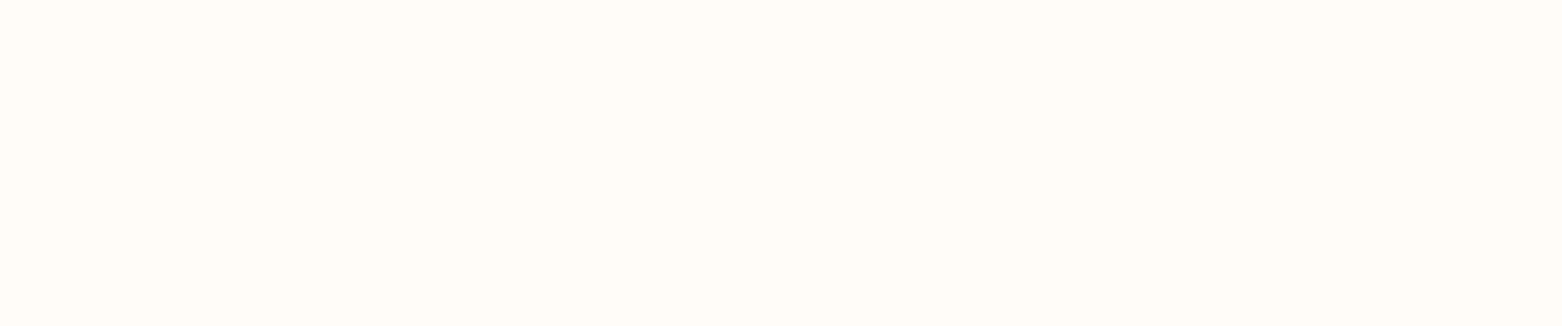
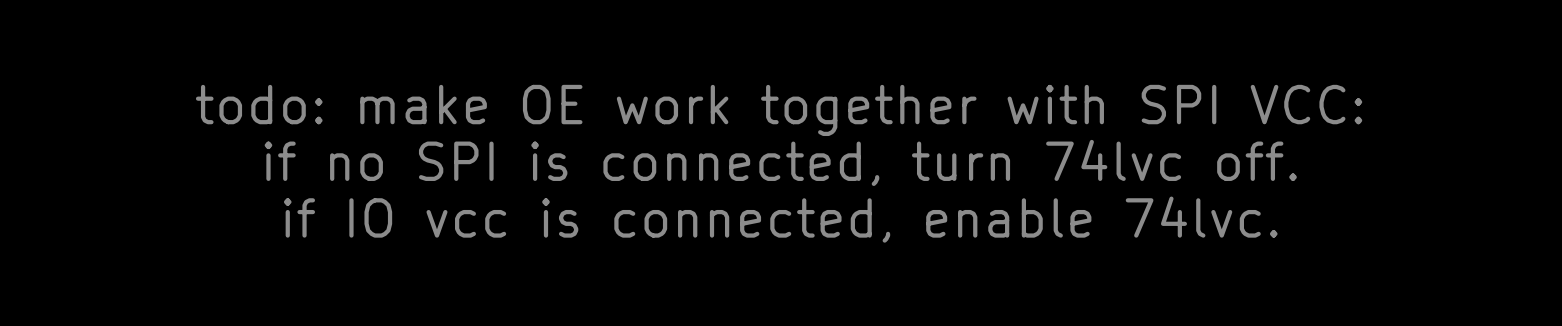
text: none -> todo: make OE work together with SPI VCC: (779, 110)
text: none -> if no SPI is connected, turn 74lvc off. (780, 162)
text: none -> if IO vcc is connected, enable 74lvc. (780, 219)

